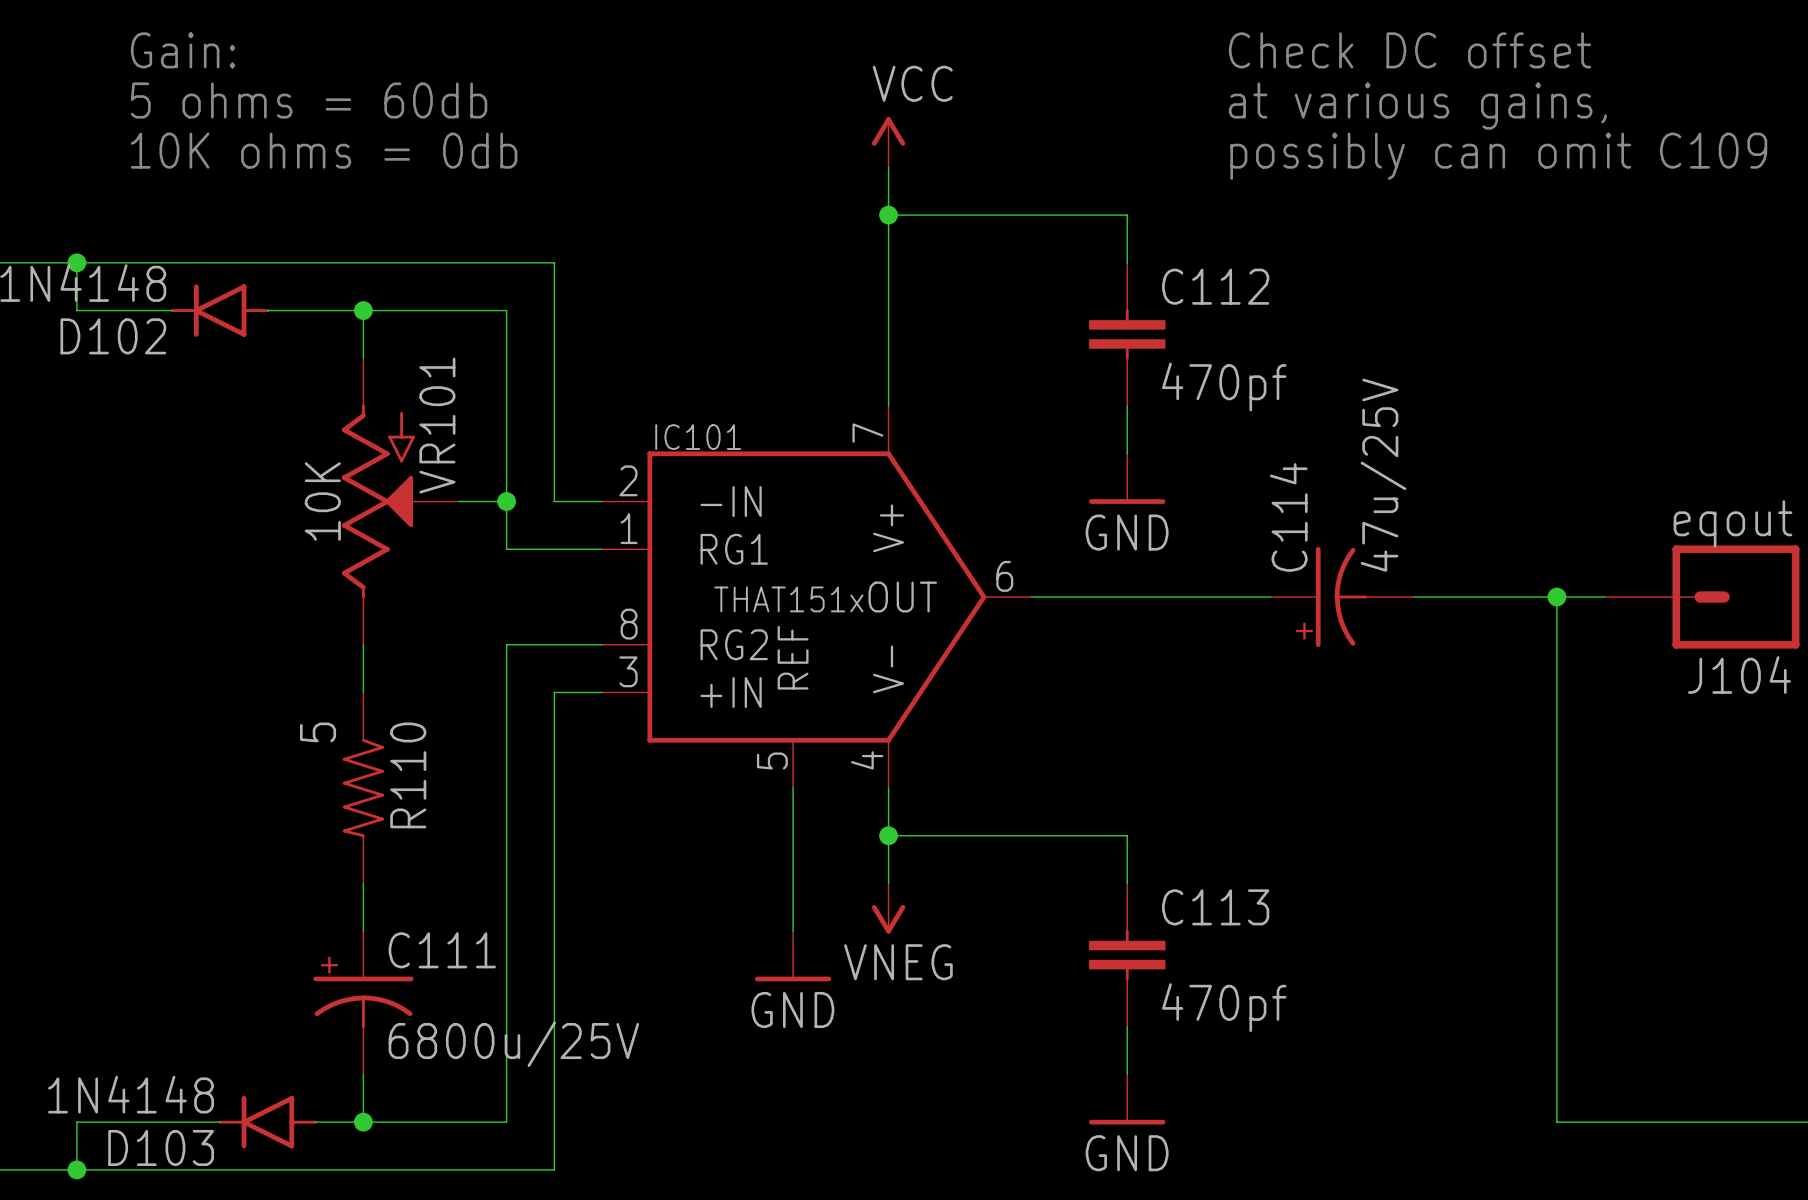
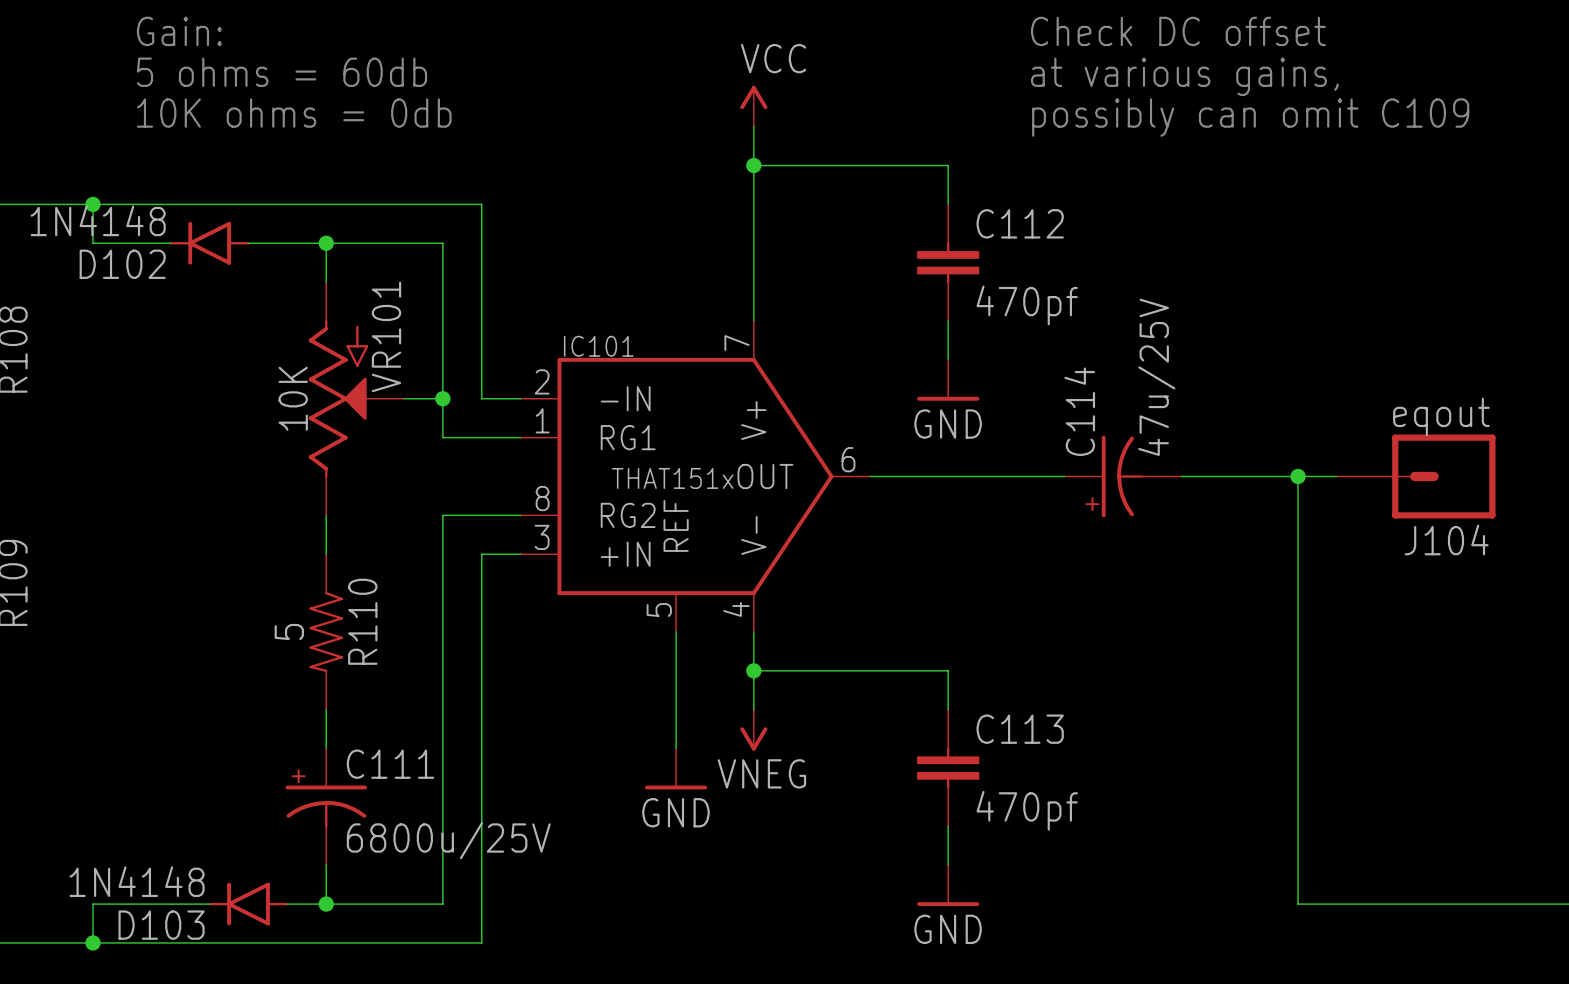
R110 value position: 5 (318, 732) -> 5 (289, 632)

